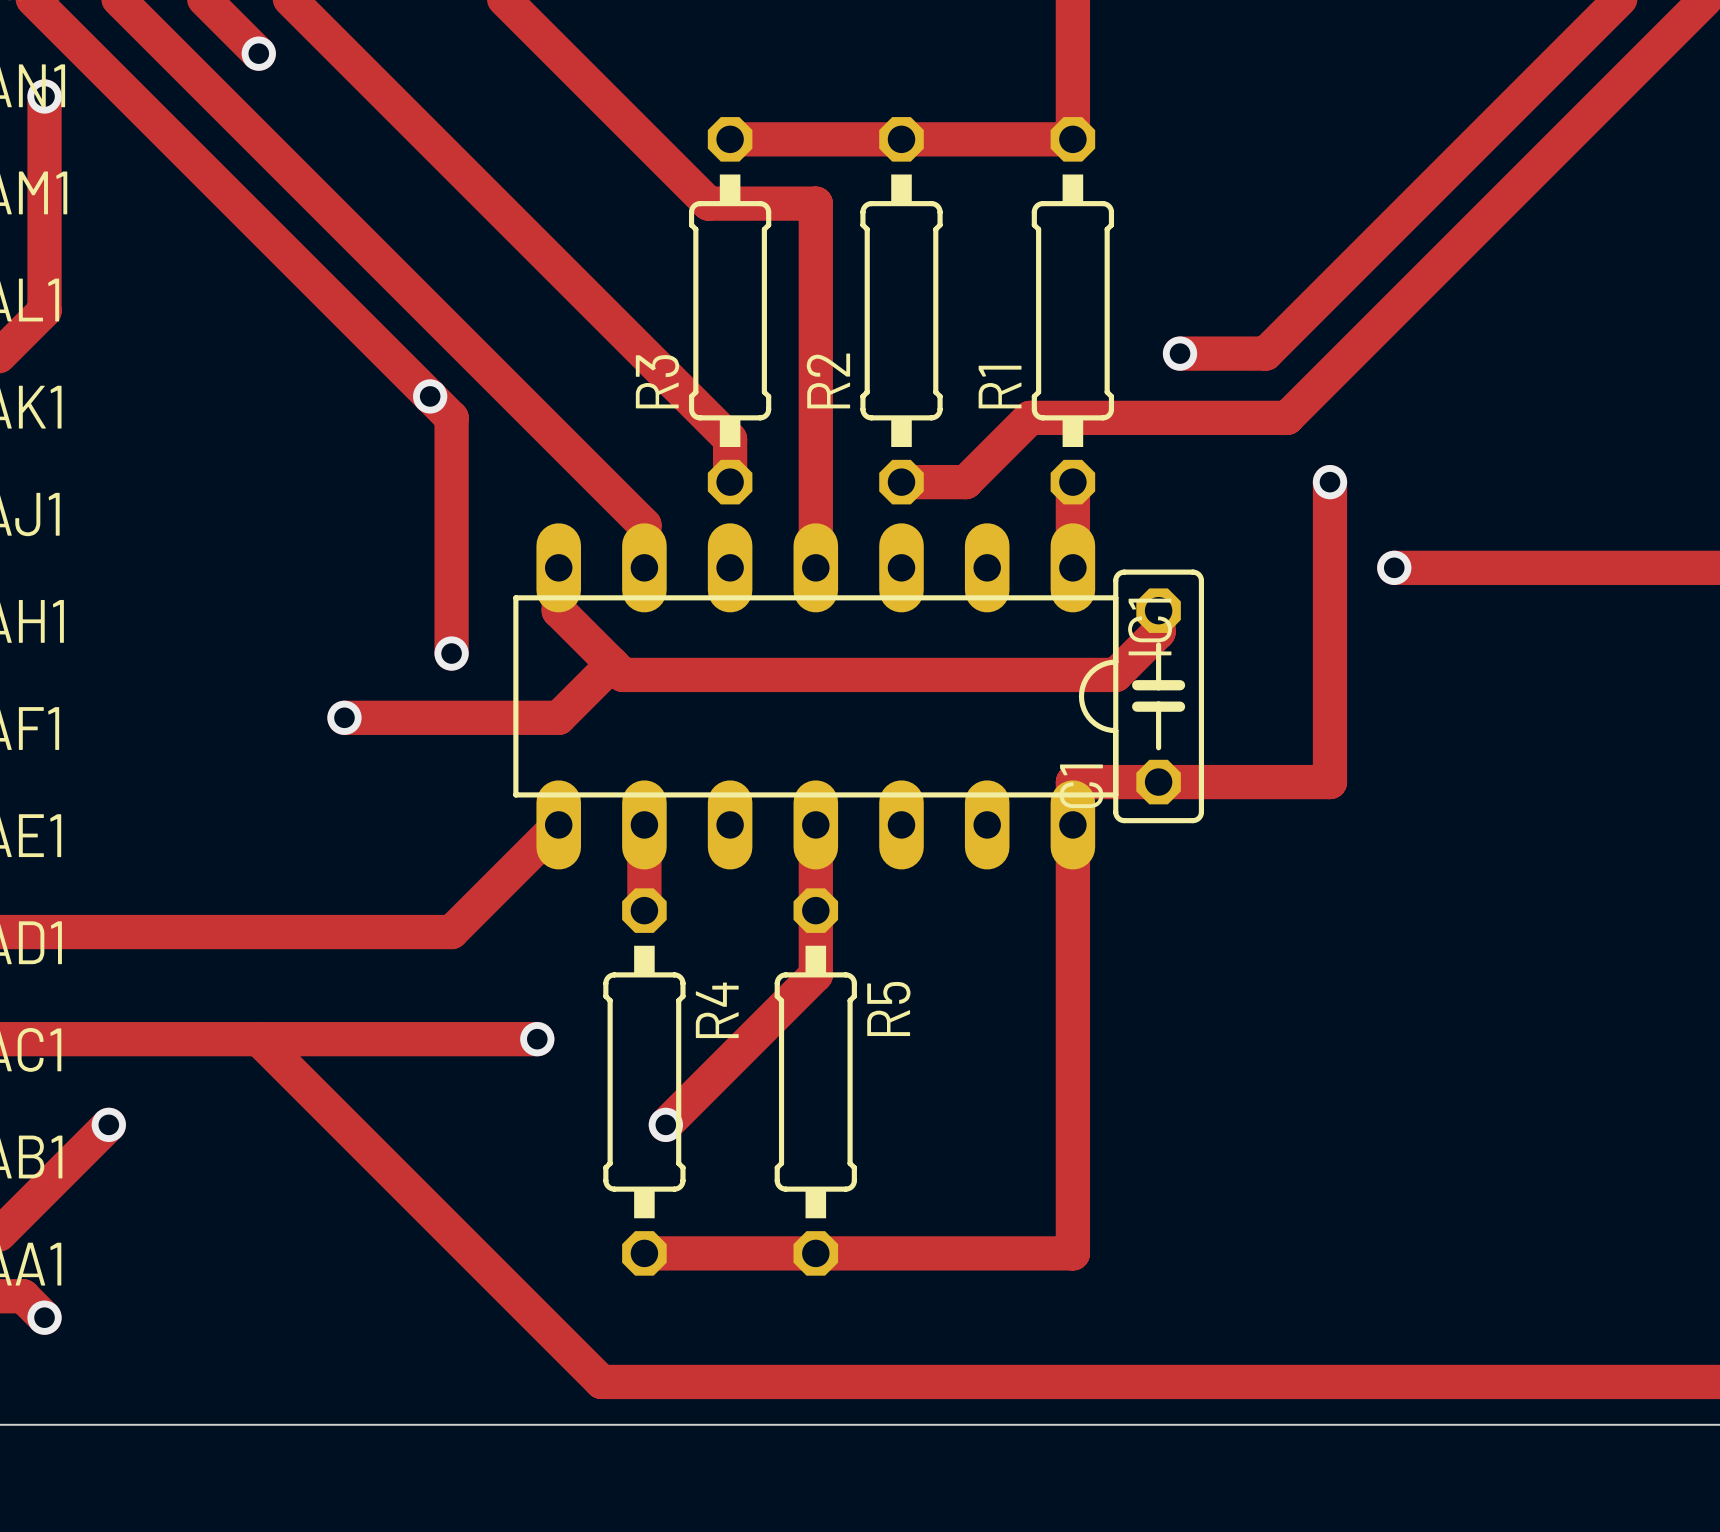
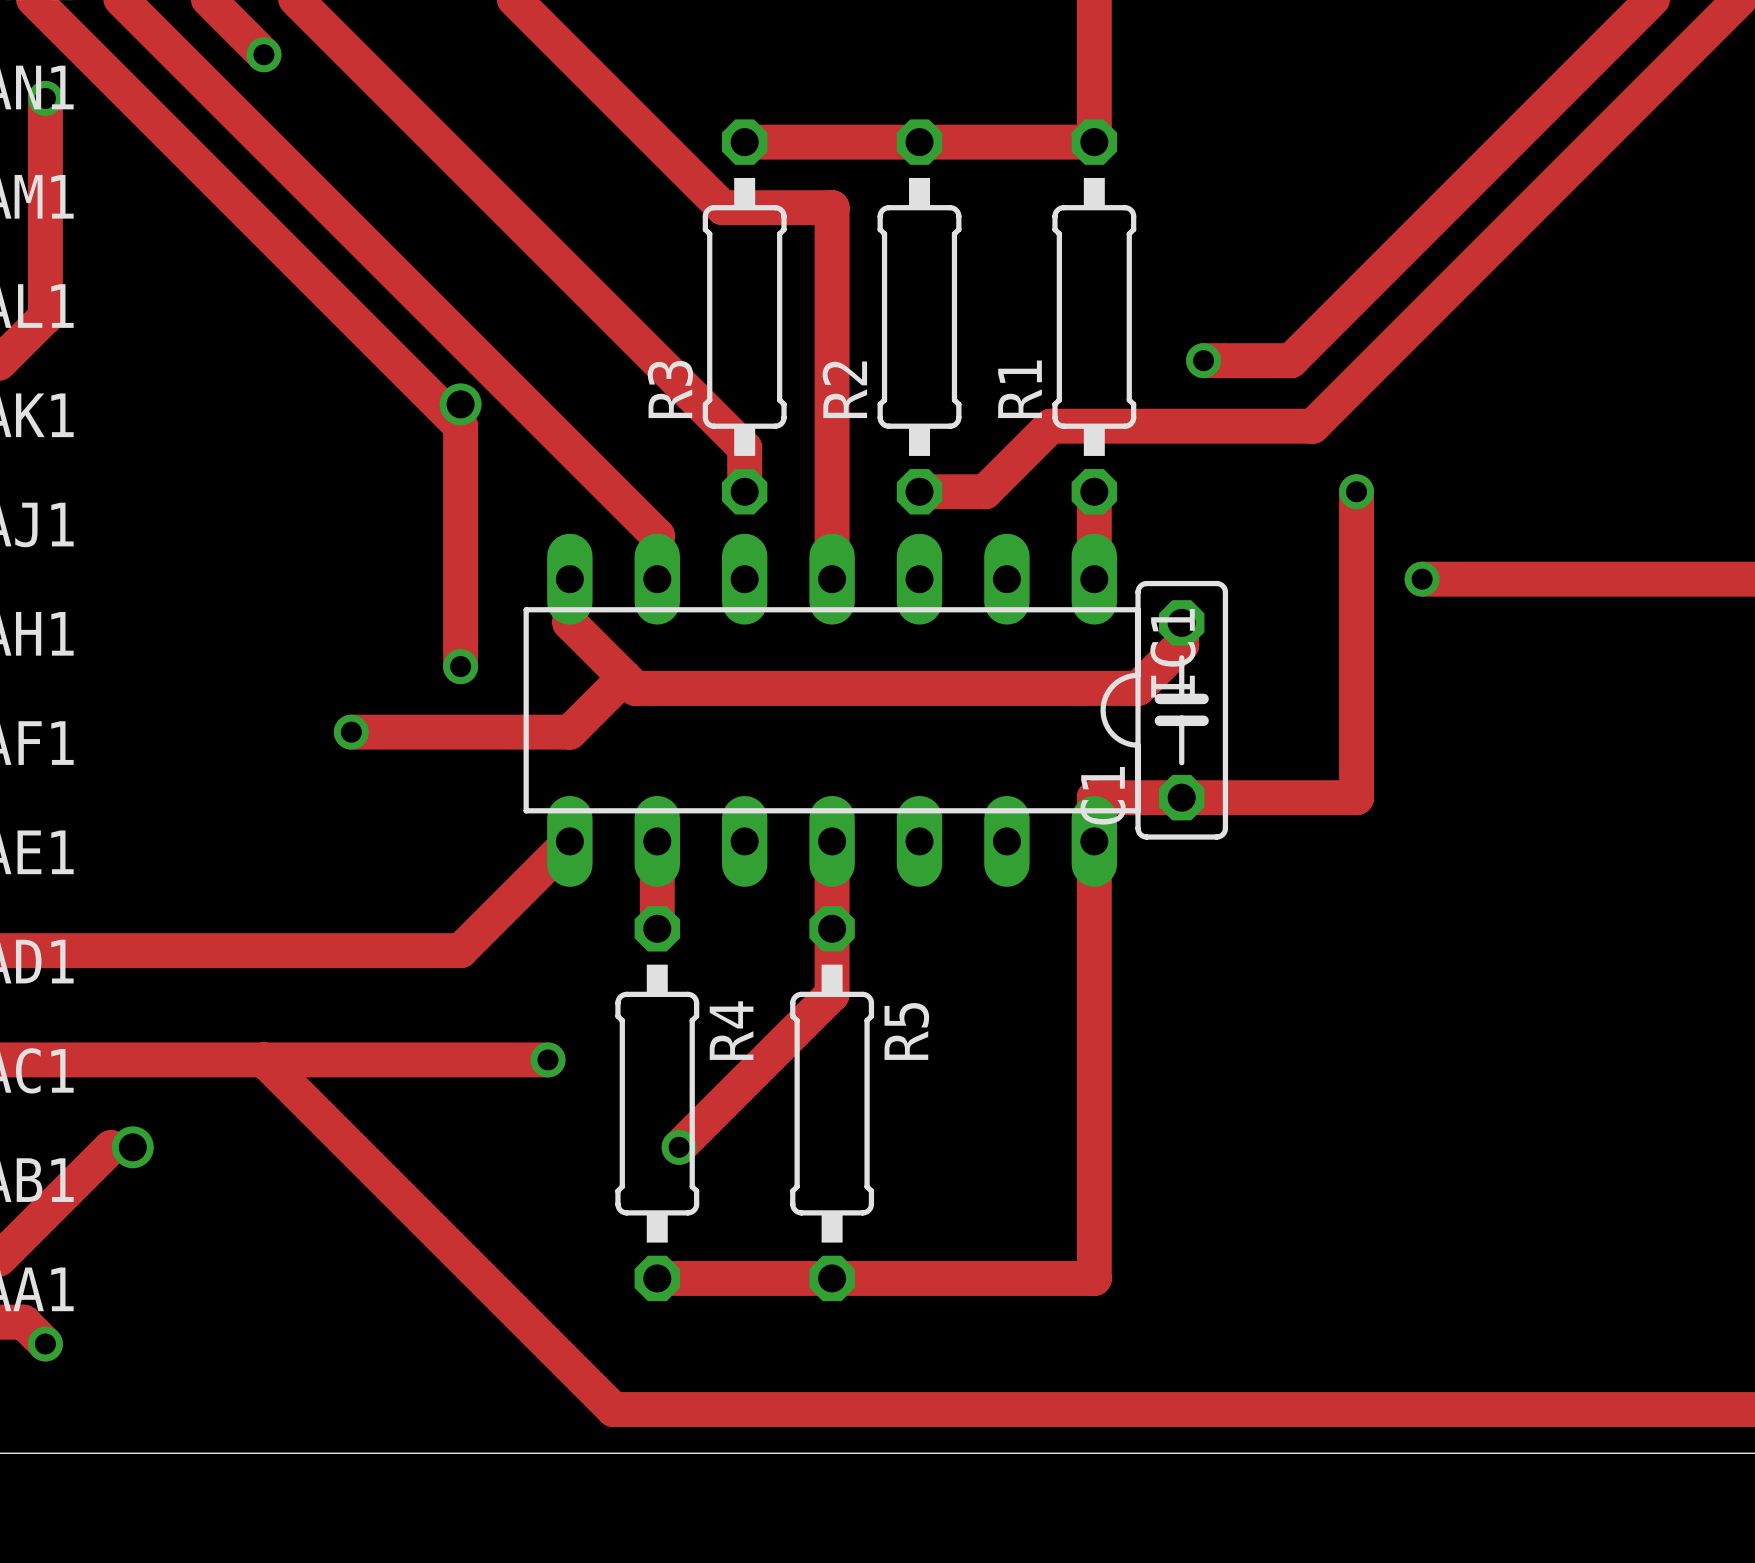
via position: (430, 396) -> (460, 404)
via position: (108, 1124) -> (132, 1147)

